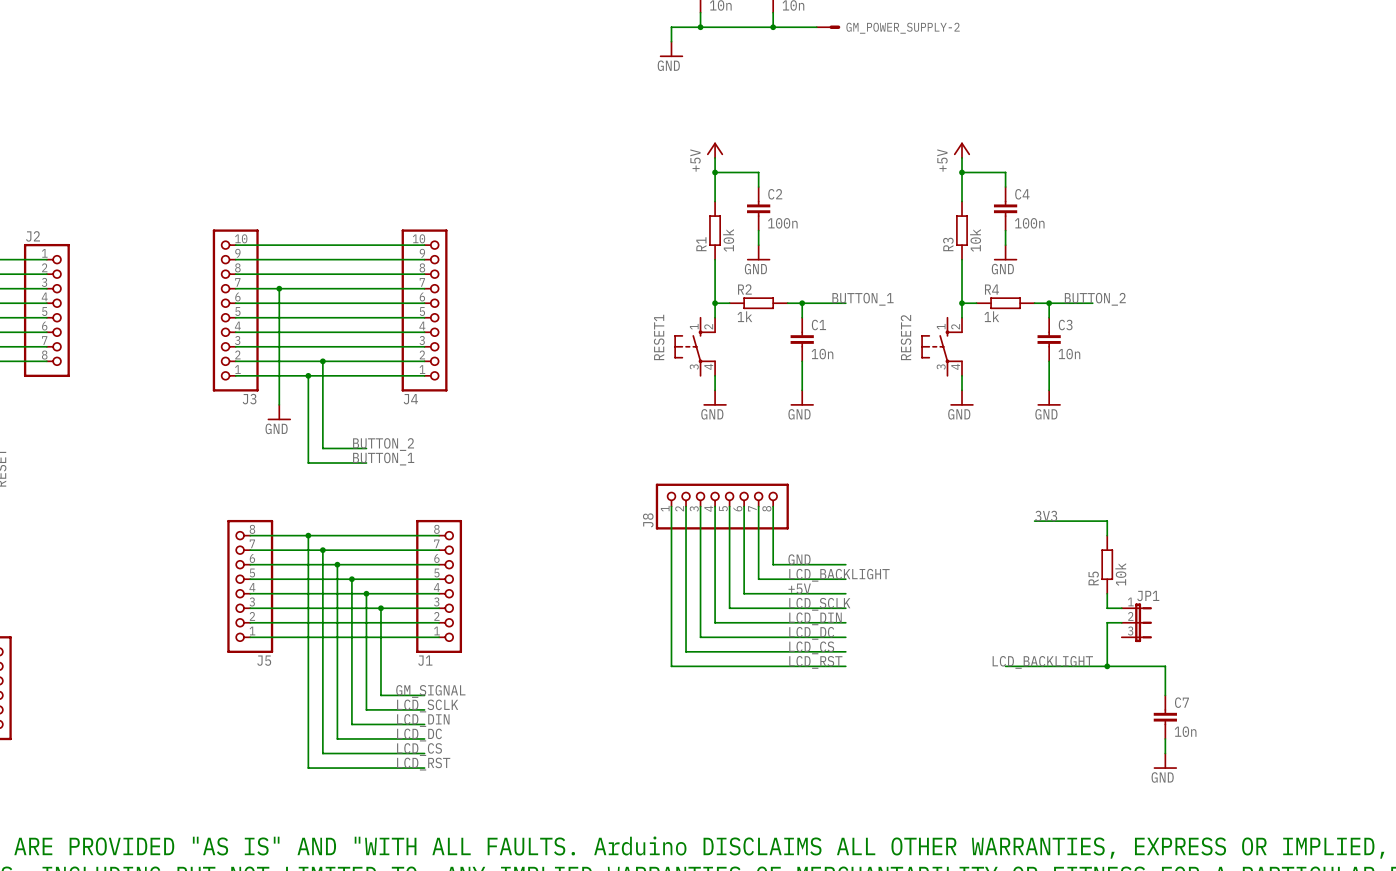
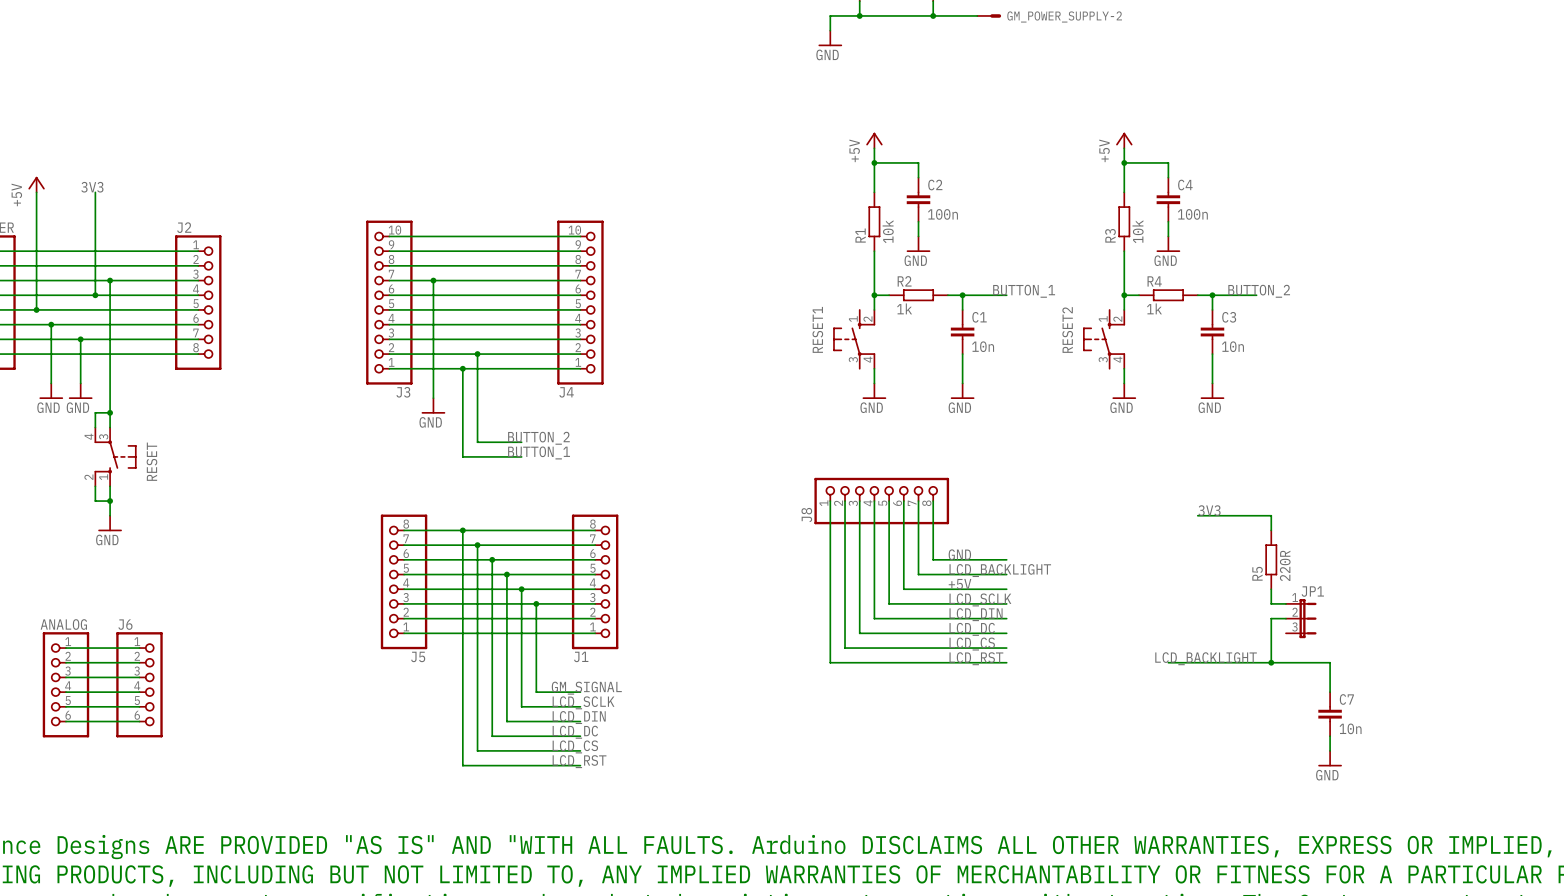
R5 value: 10k (1120, 574) -> 220R (1285, 565)

